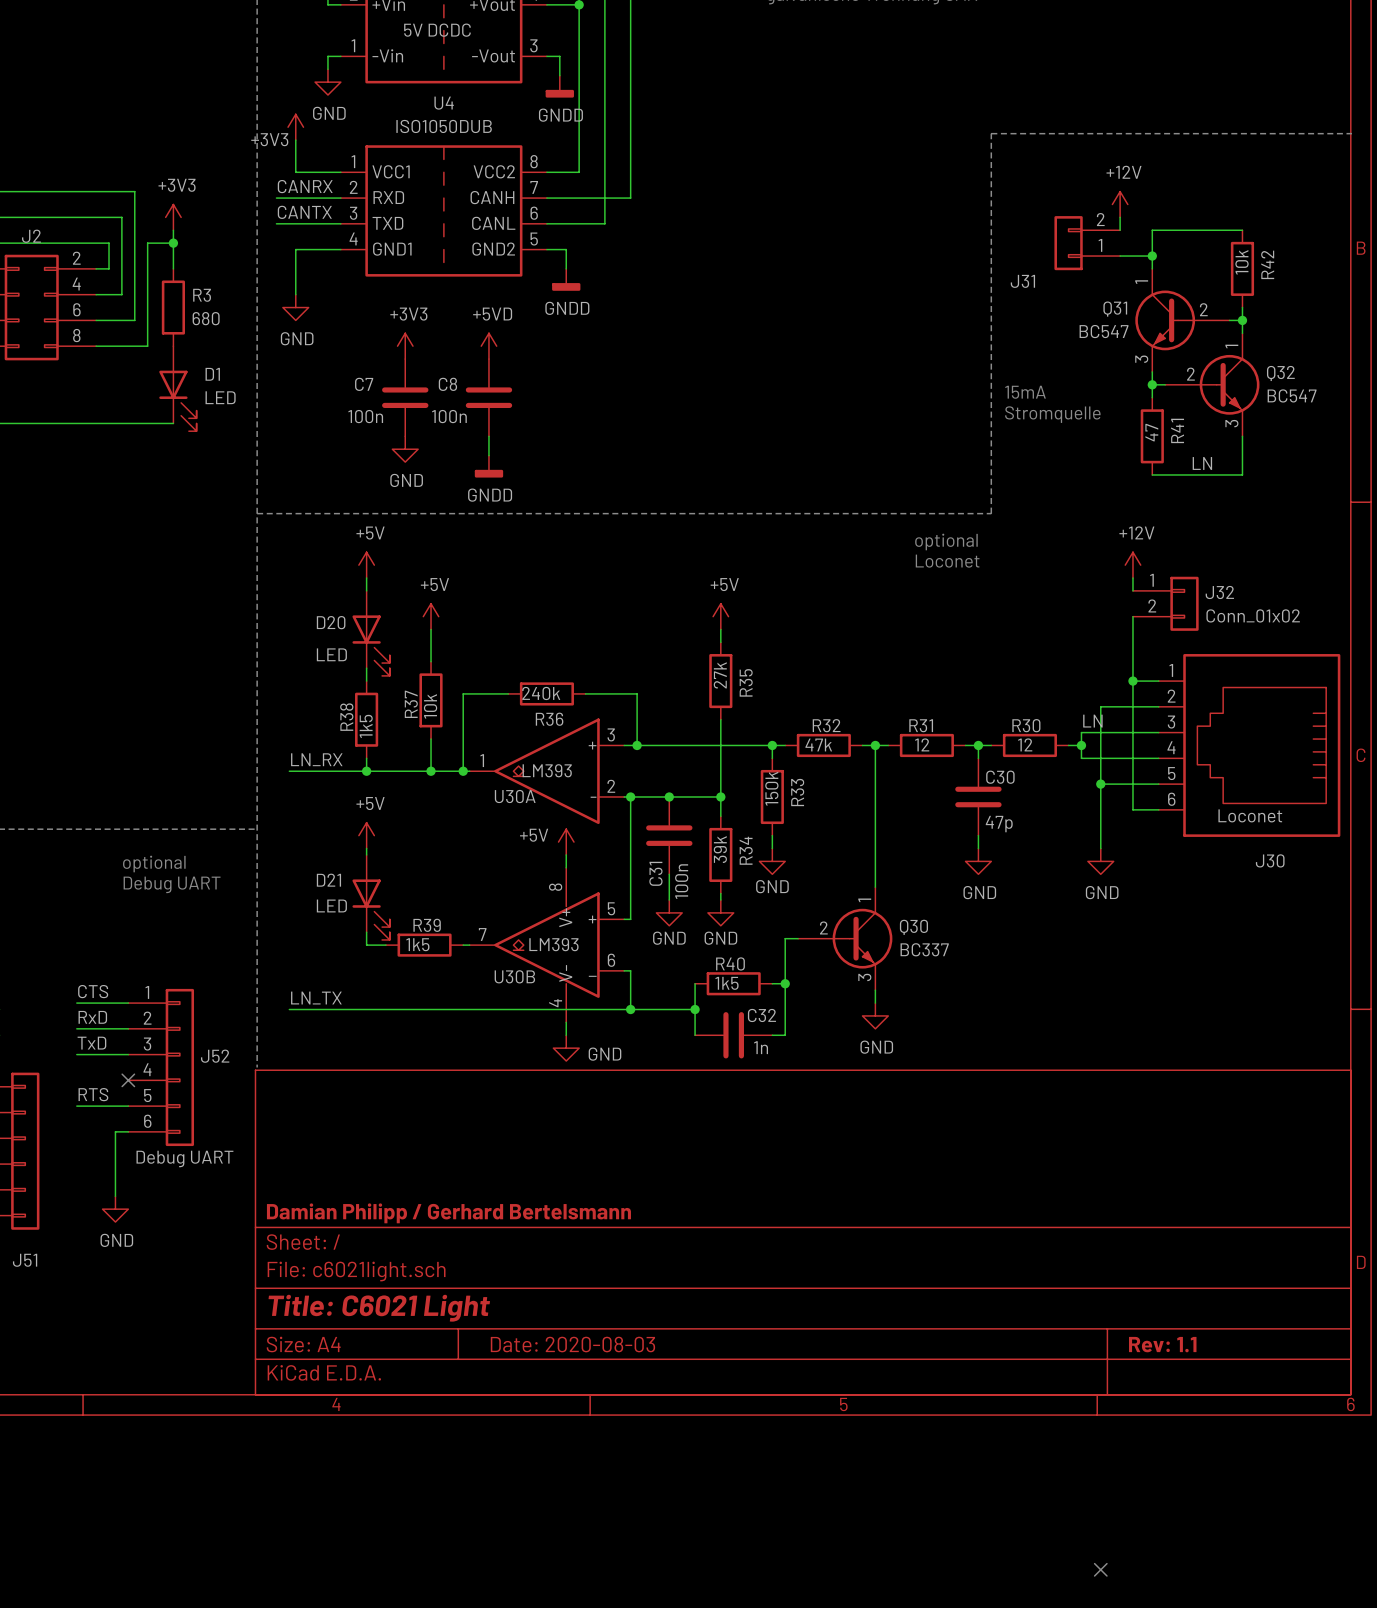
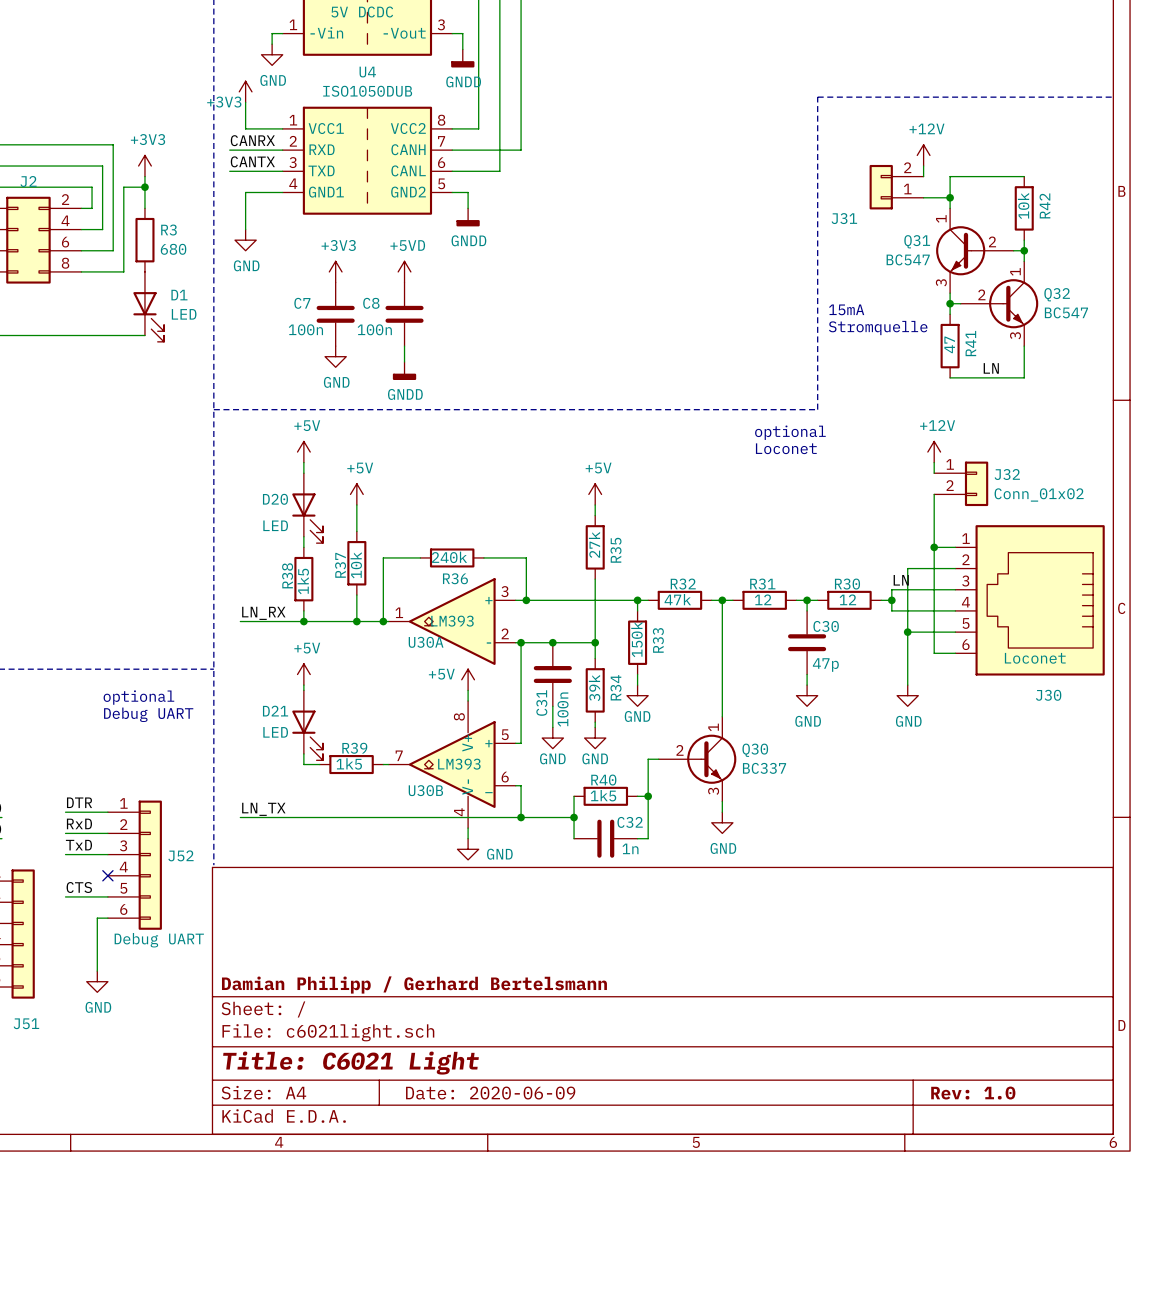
label: CTS (93, 991) -> DTR (79, 802)
label: RTS (93, 1094) -> CTS (79, 887)
title block: Date: 2020-08-03 (572, 1344) -> Date: 2020-06-09 (490, 1093)
title block: Rev: 1.1 (1162, 1344) -> Rev: 1.0 (973, 1093)
no-connect mark: (1100, 1569) -> none

